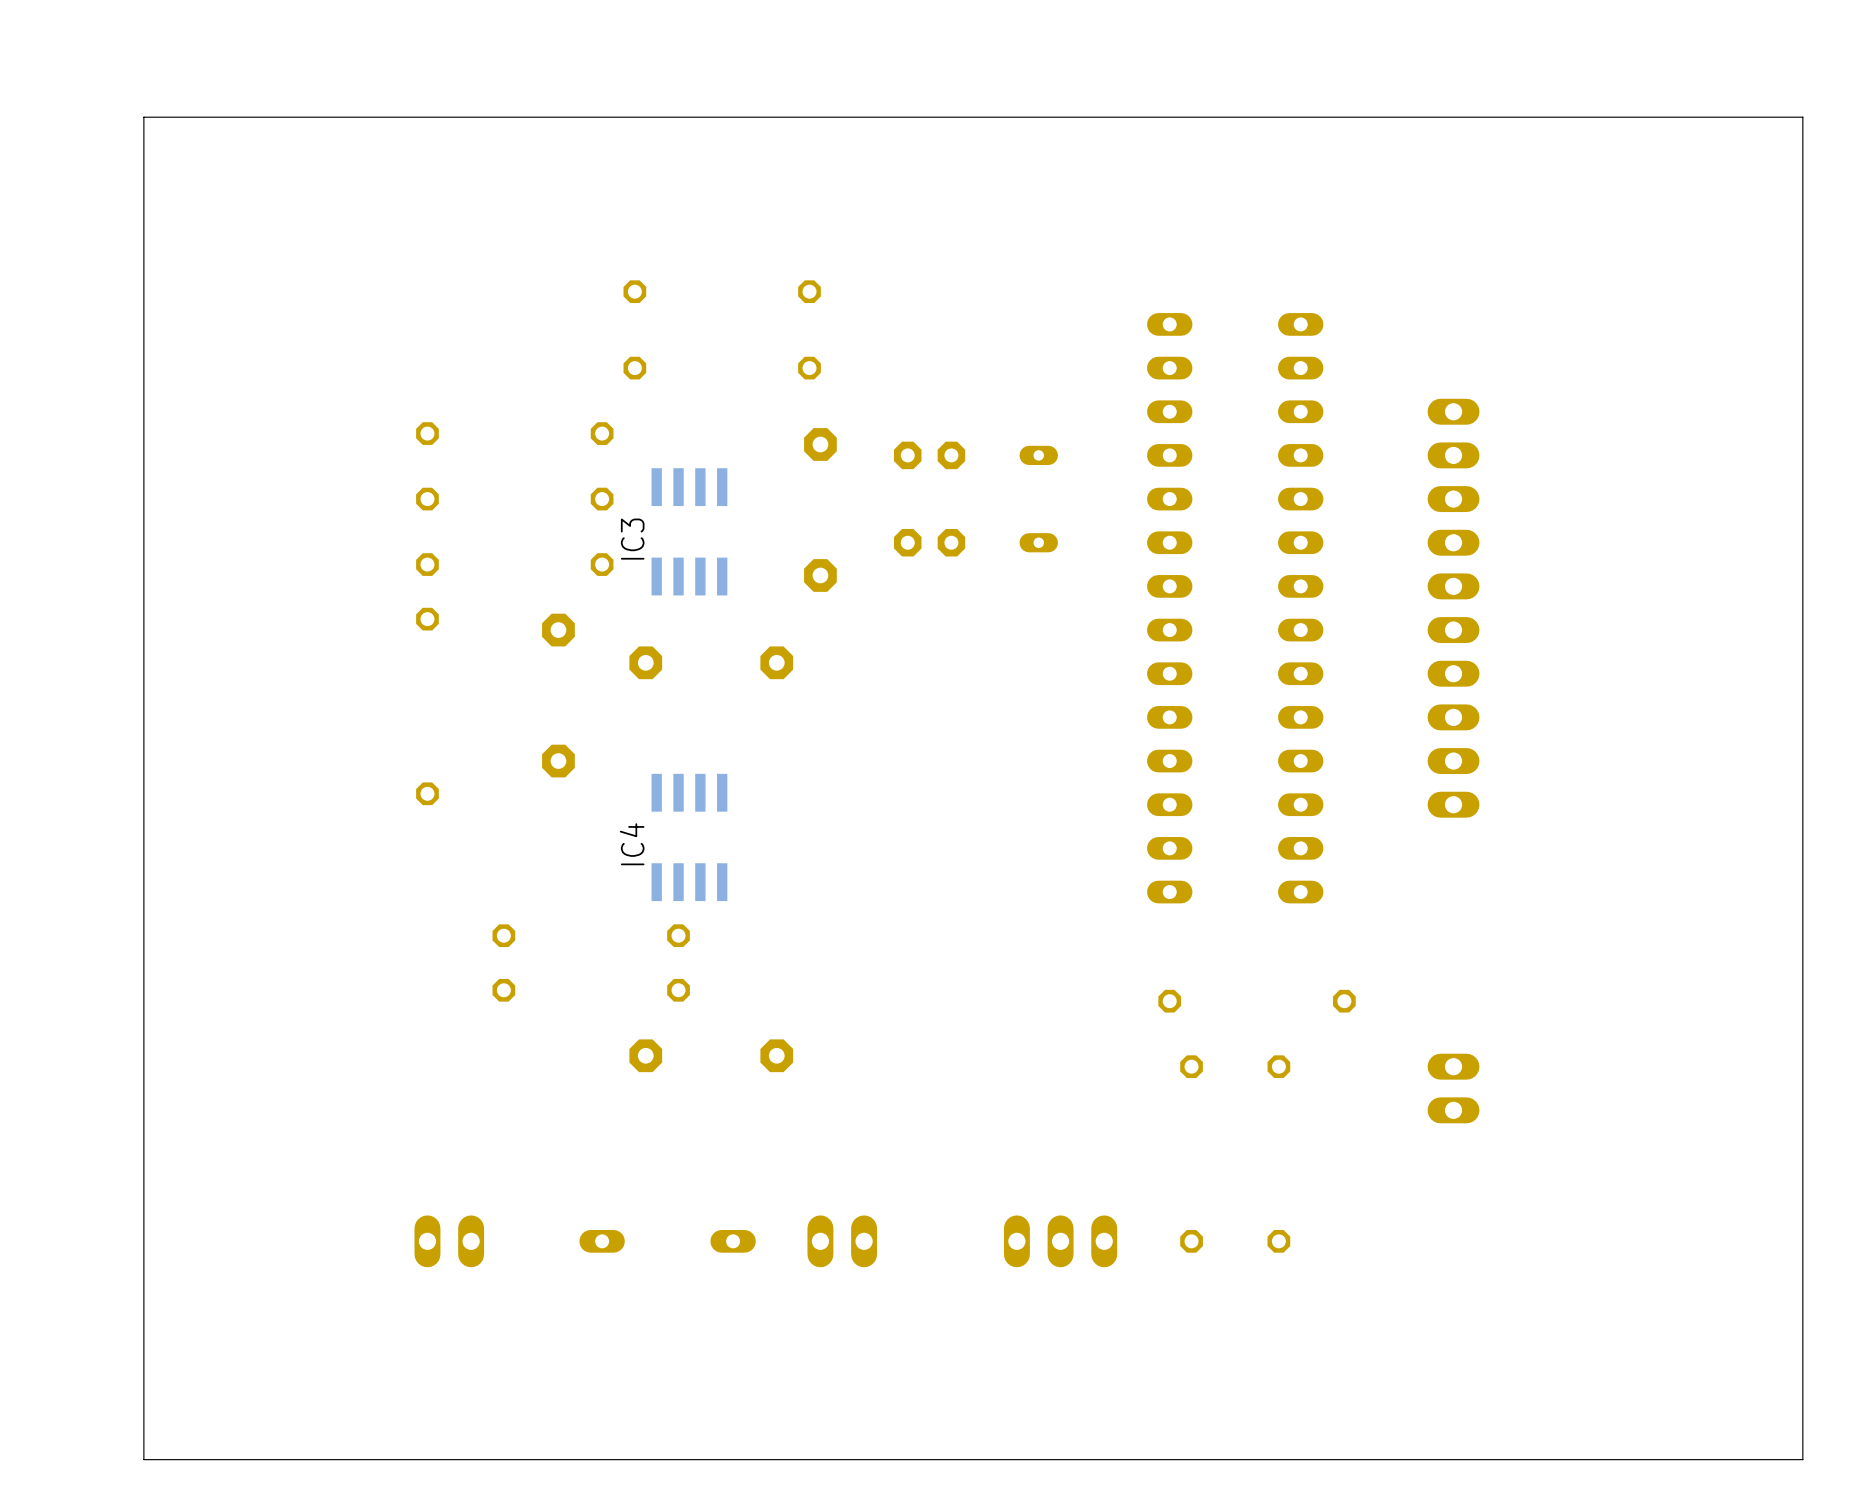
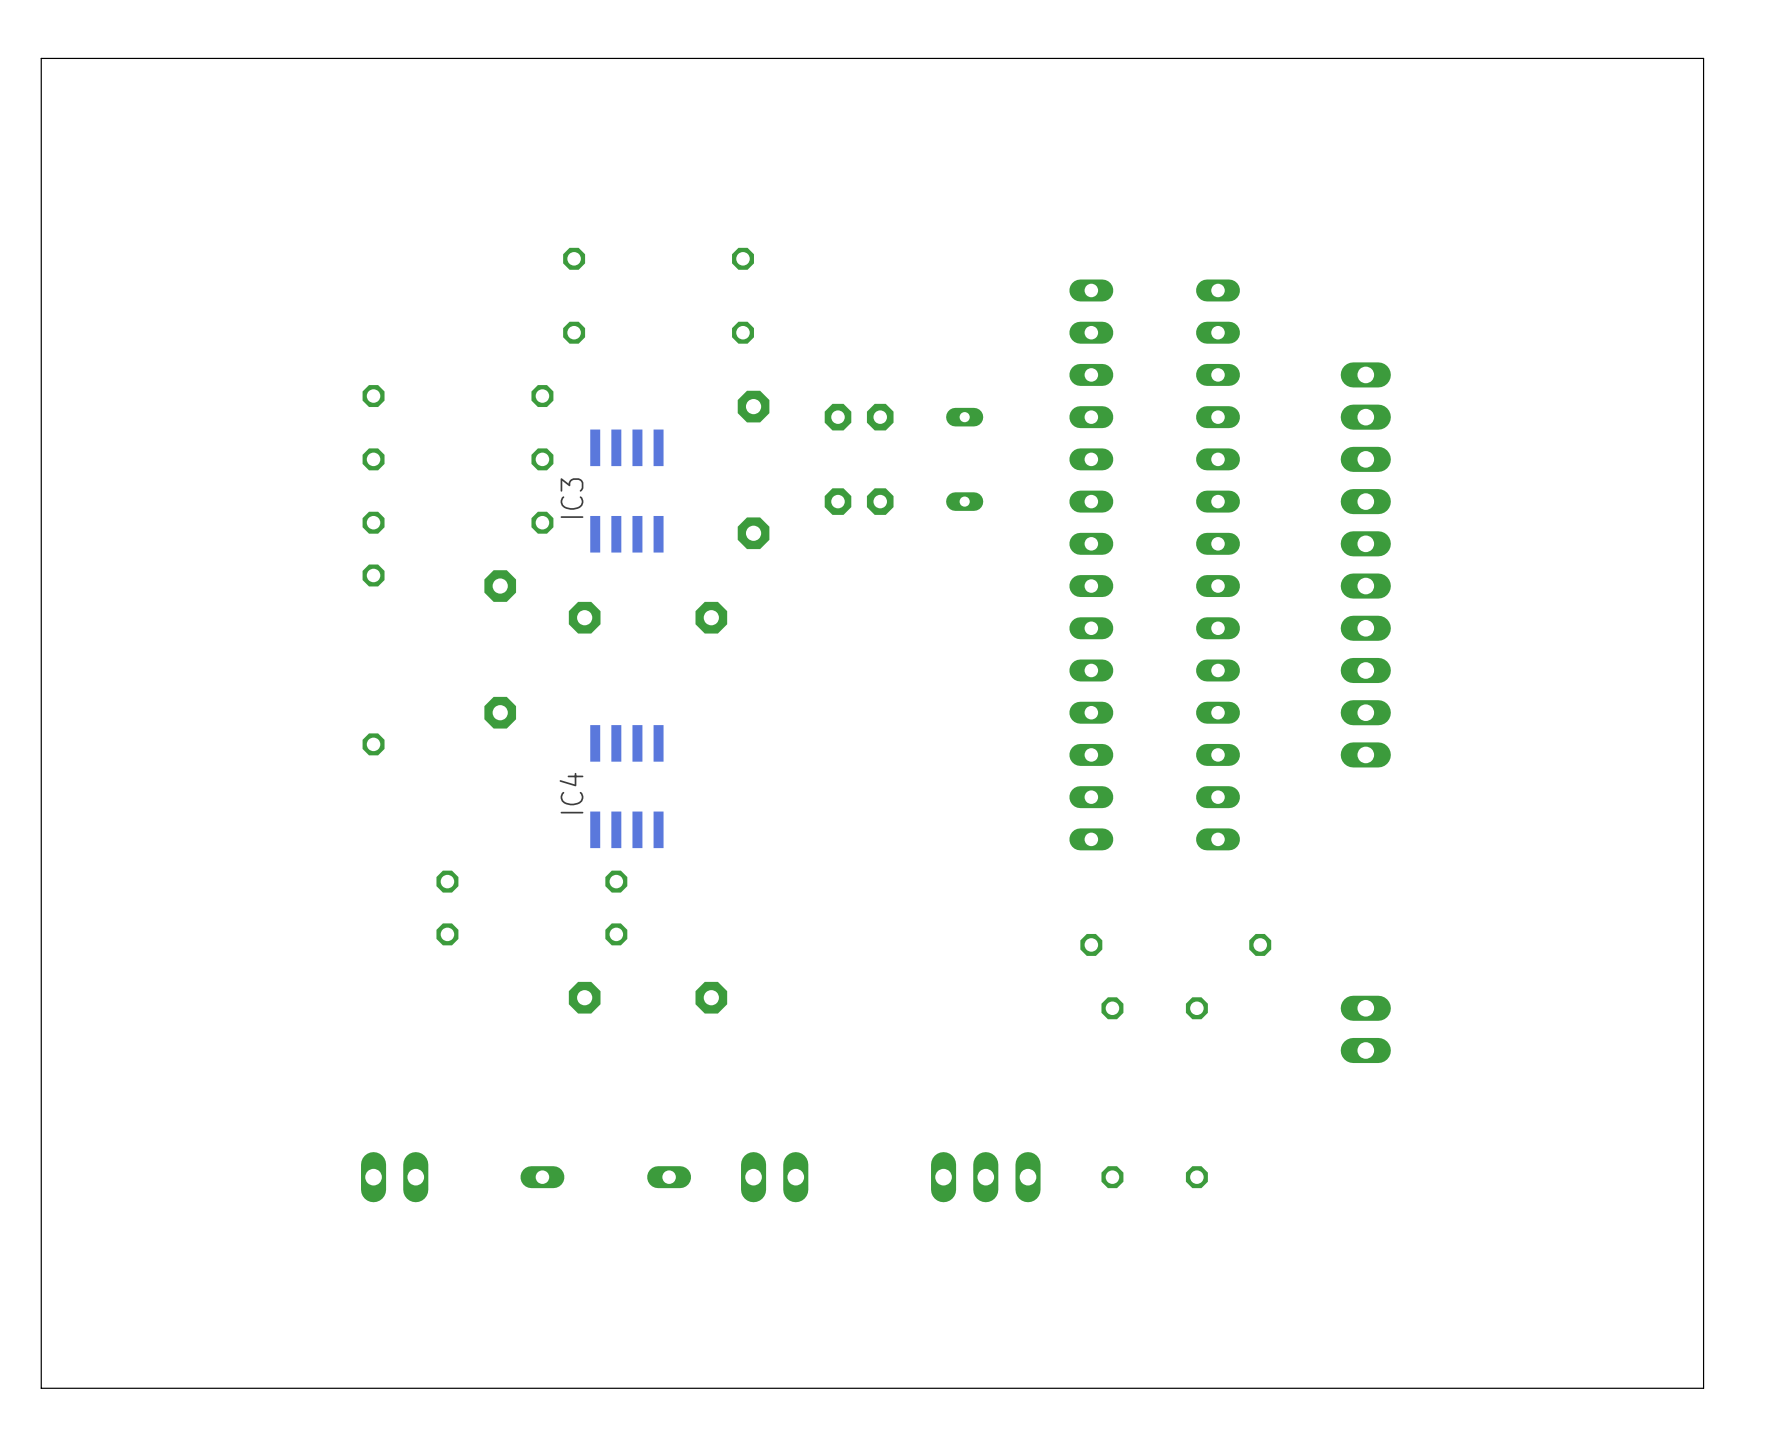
board edge: (1802, 117) (143, 117) (143, 1459) -> (1703, 90) (1703, 58) (41, 58) (41, 1388) (99, 1388)

